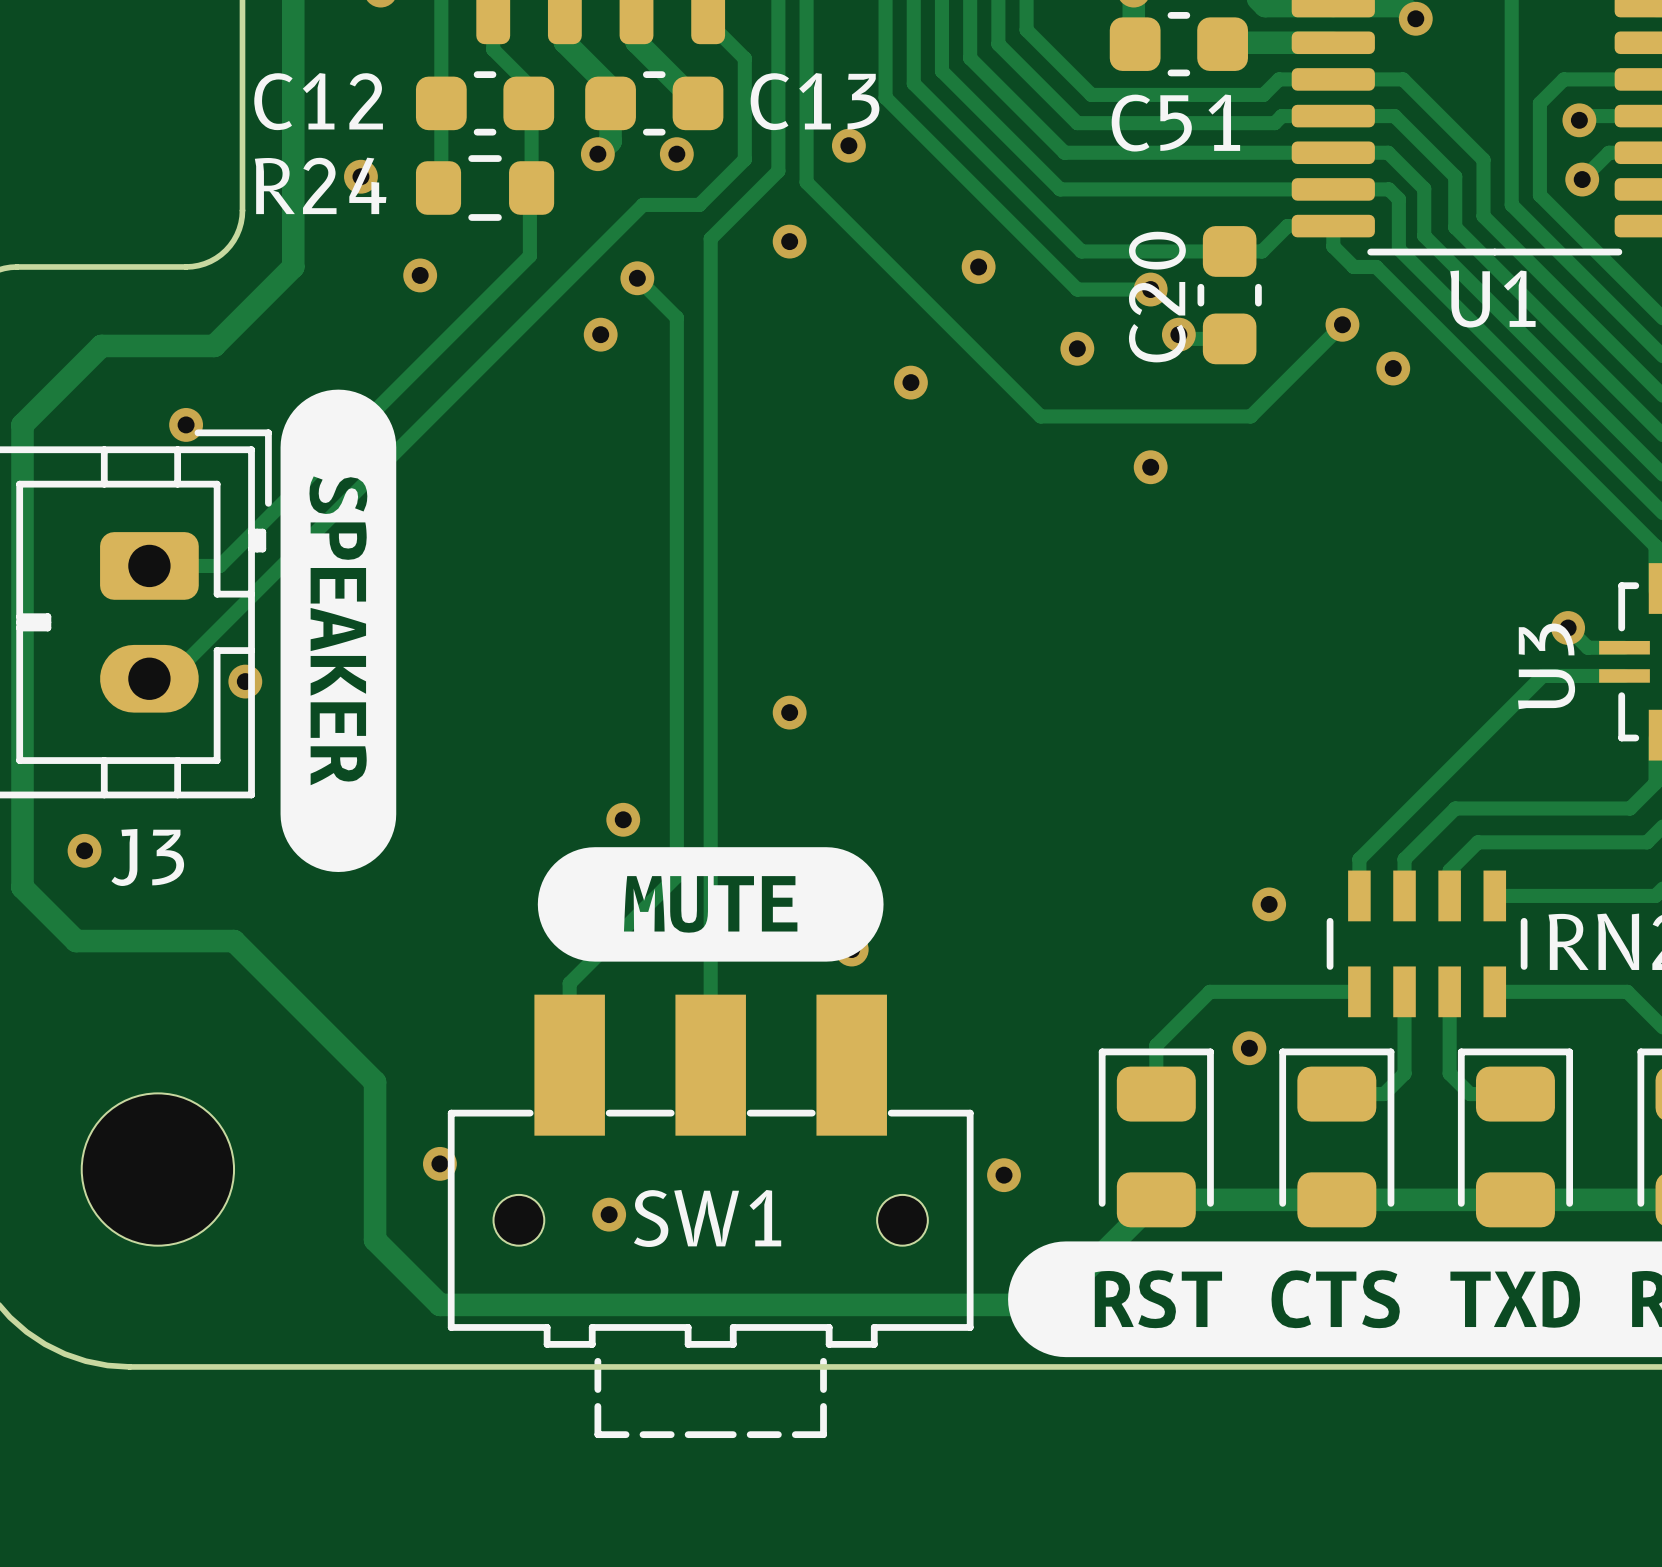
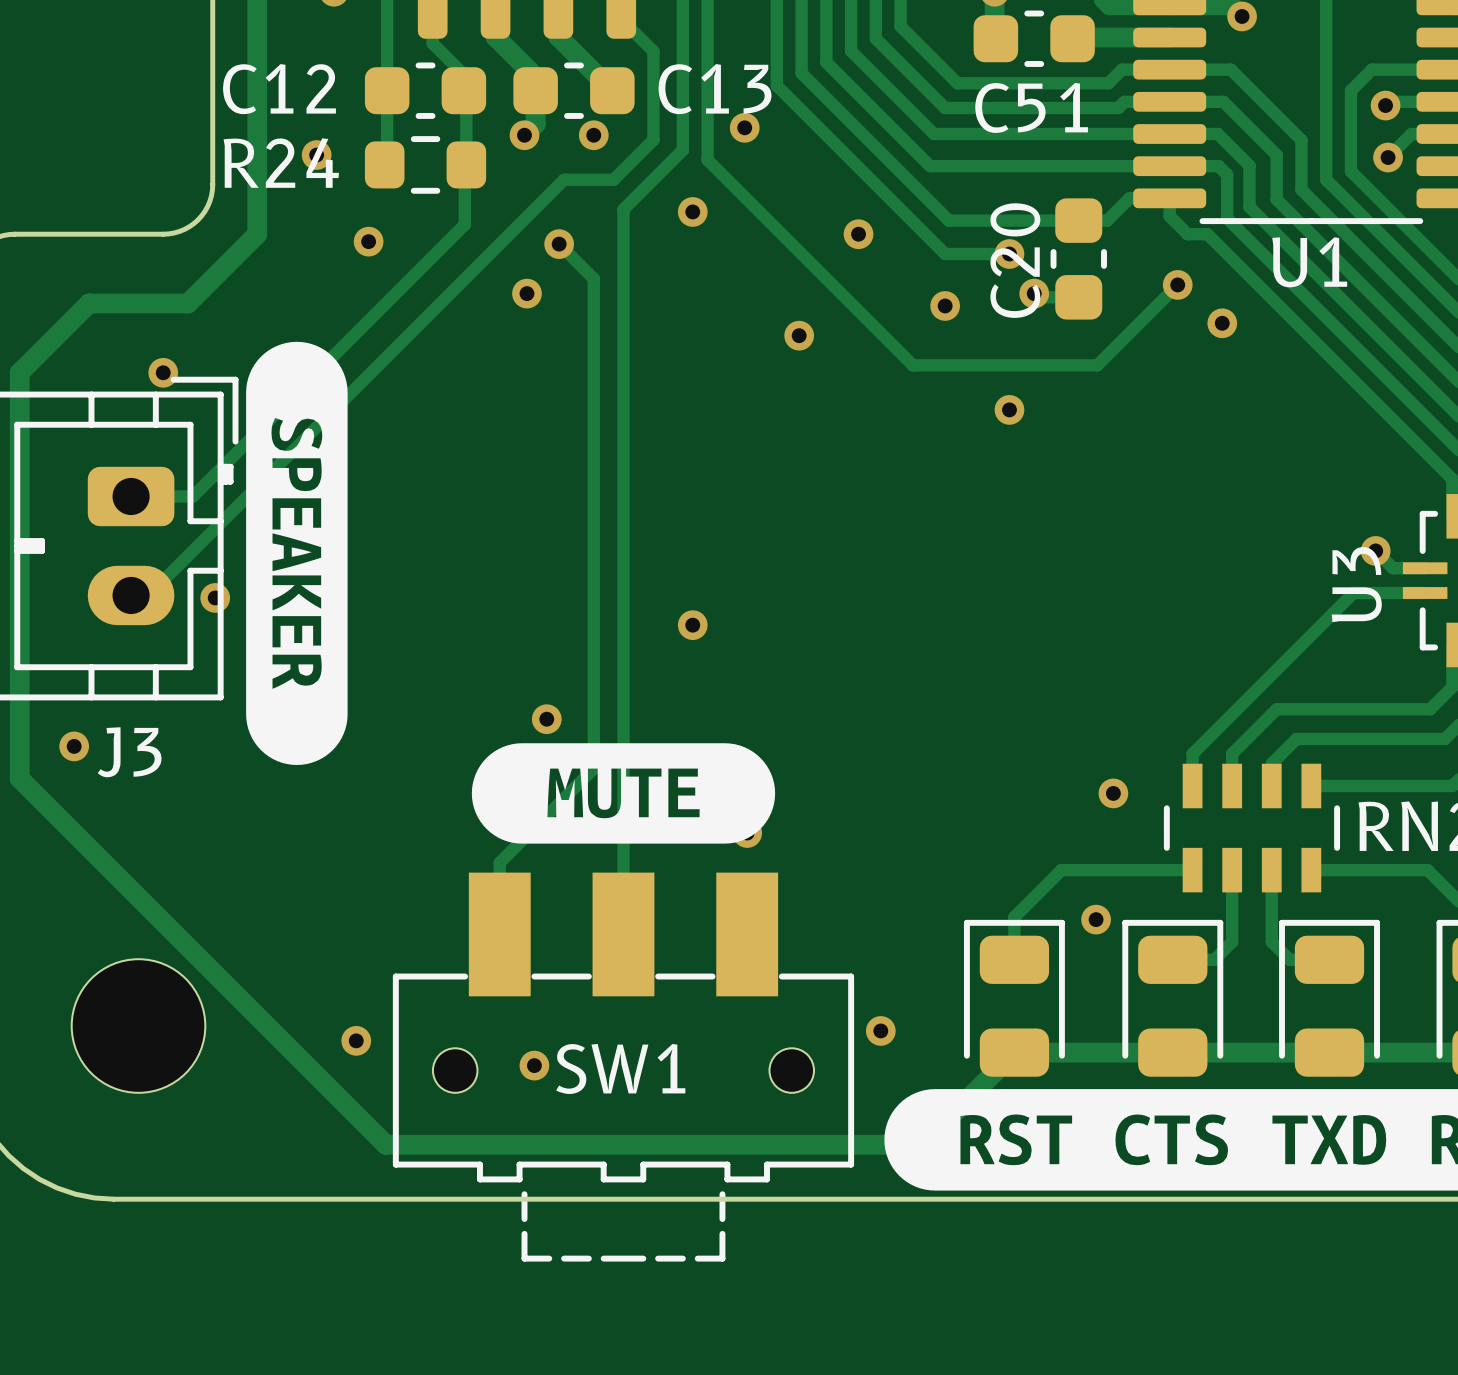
track: (76, 941) (234, 941) (375, 1082) (375, 1240) -> (66, 825) (329, 1087)
via position: (439, 1163) -> (356, 1040)

